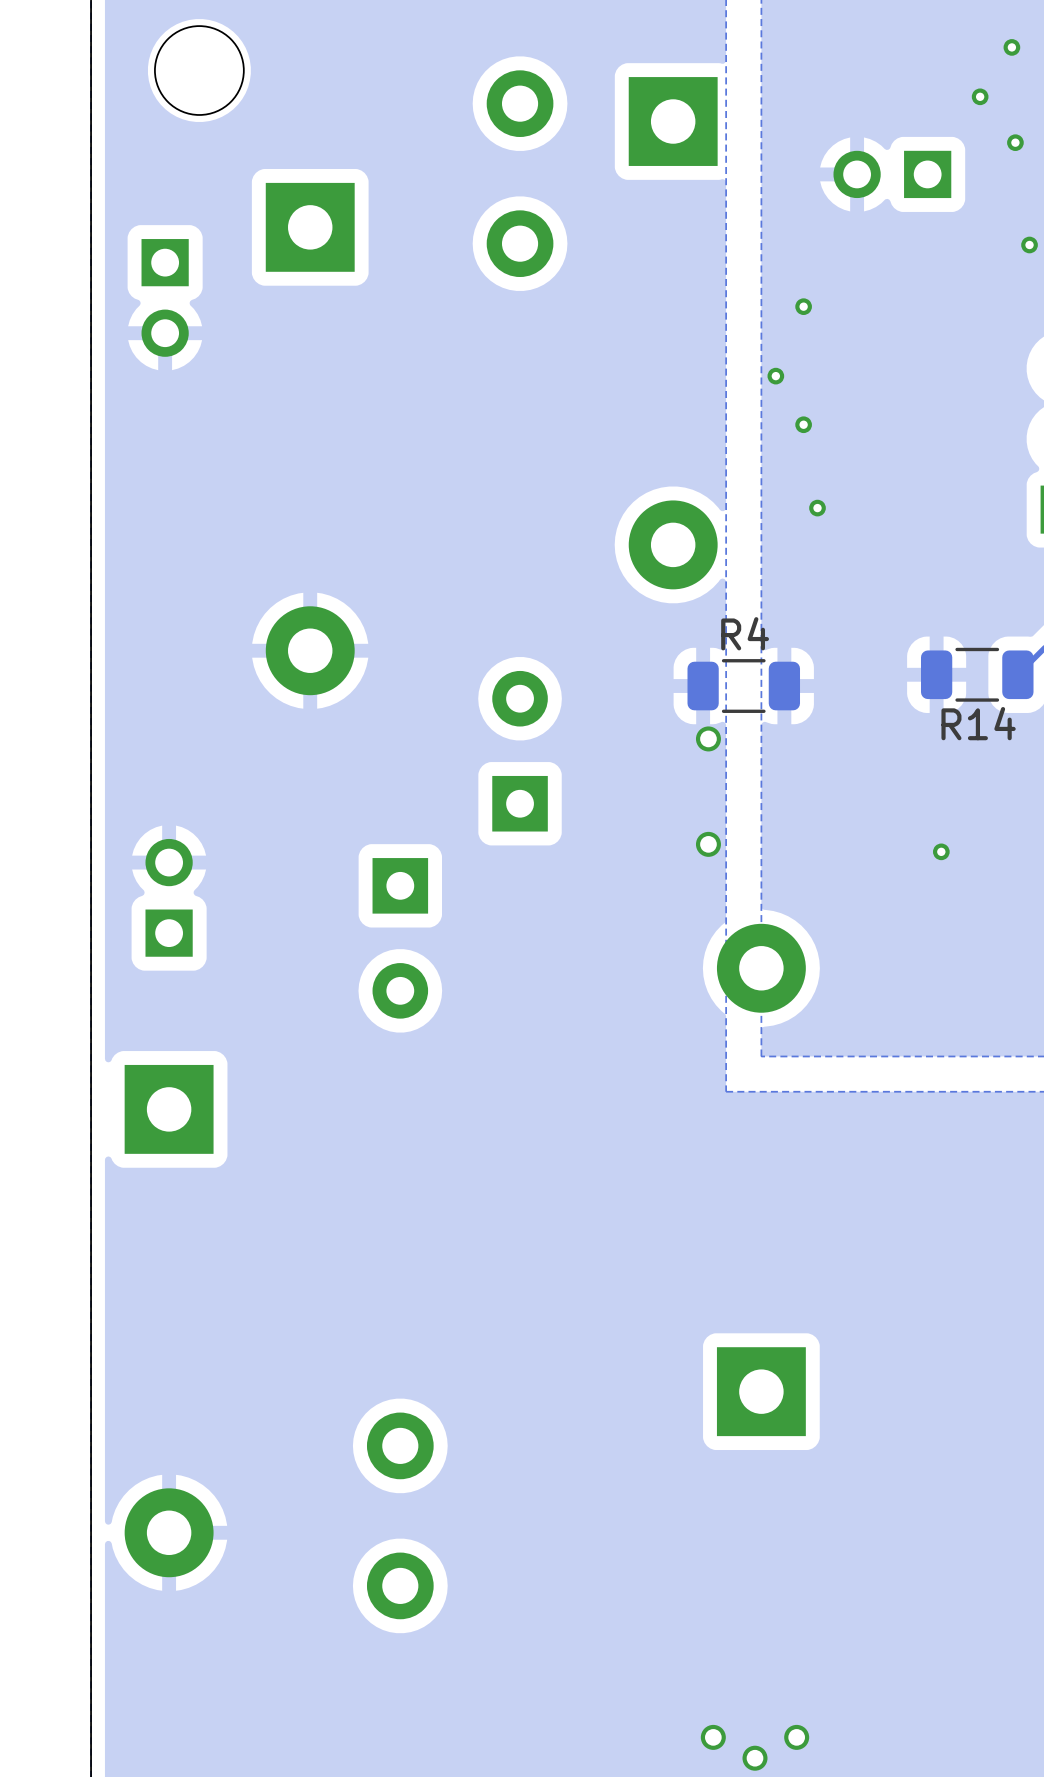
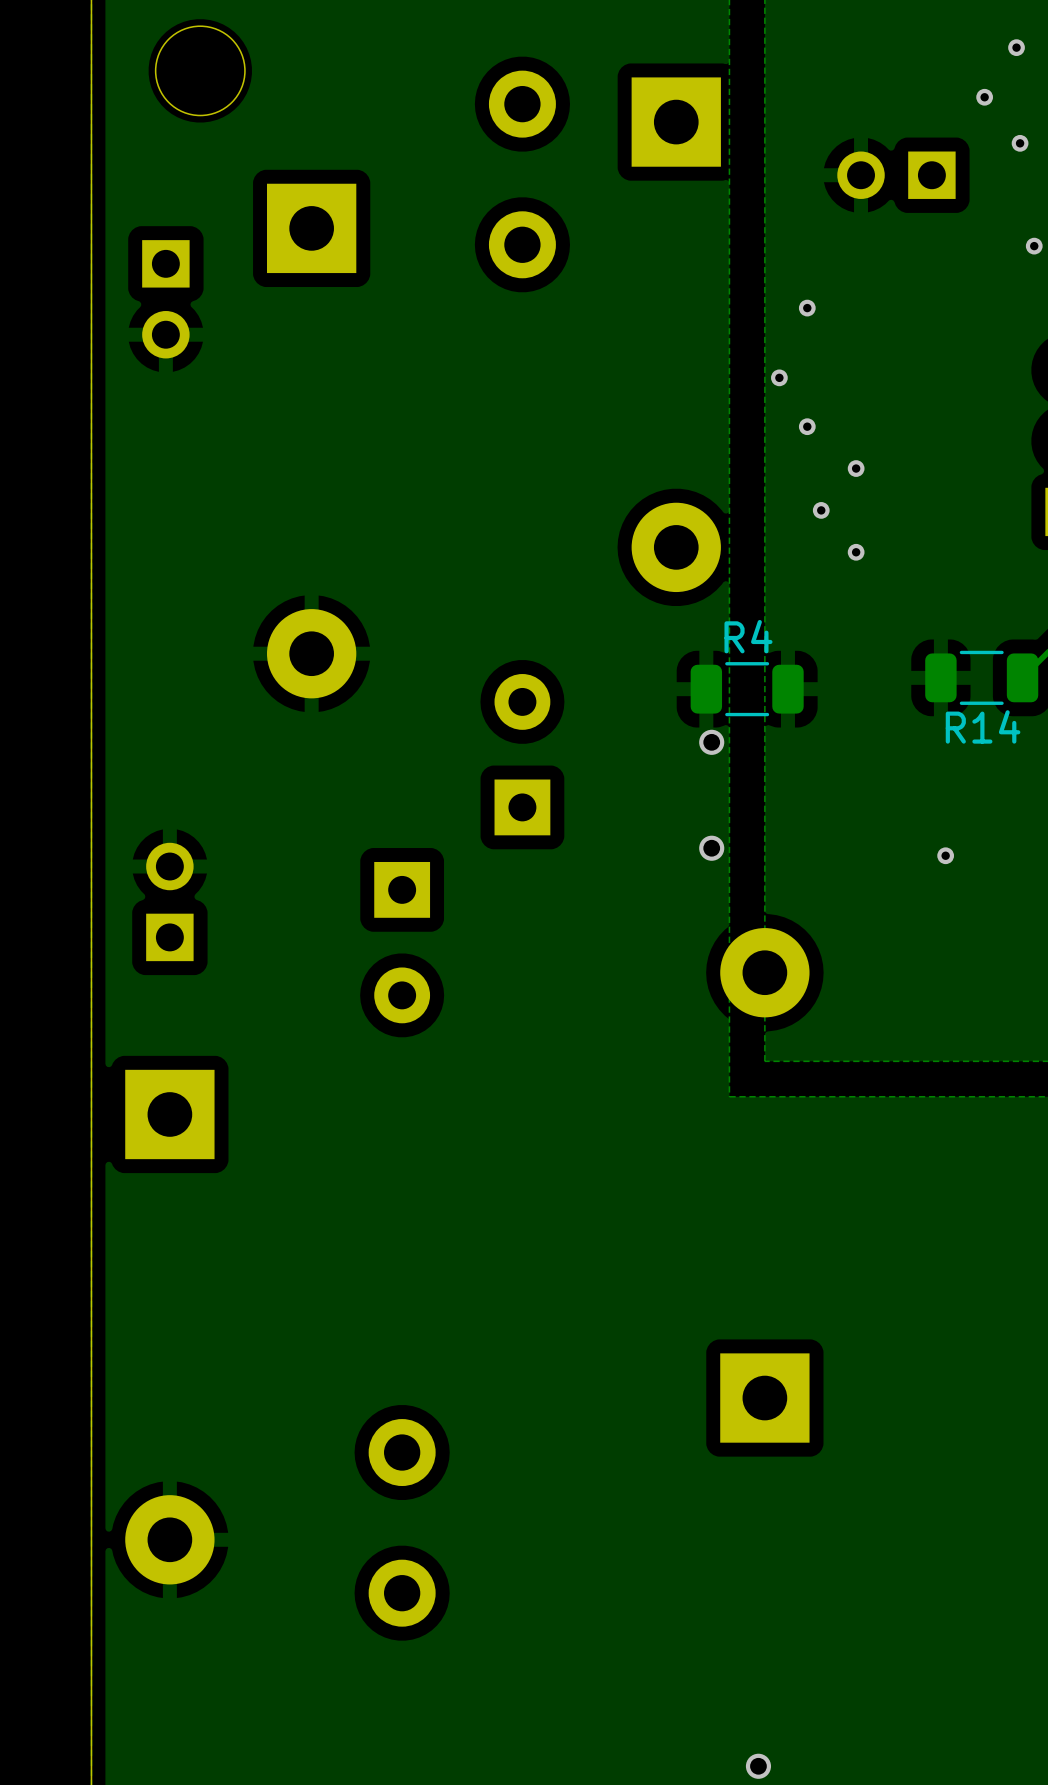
via: none -> (856, 468)
via: none -> (856, 552)
via: (713, 1737) -> none
via: (796, 1737) -> none

